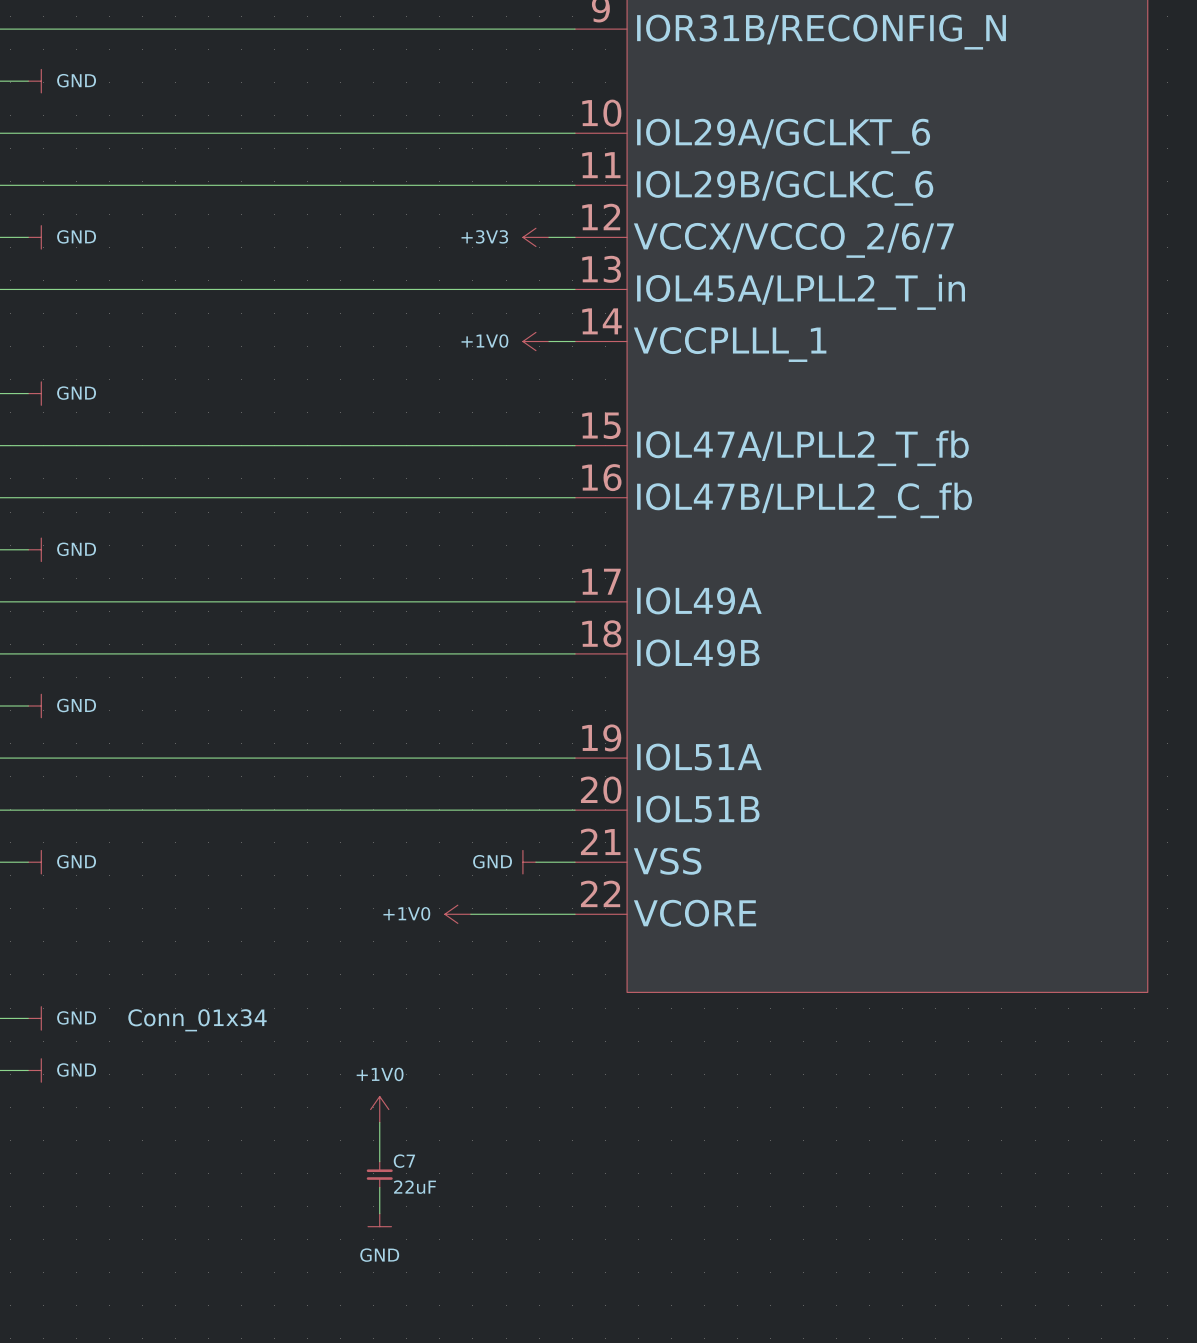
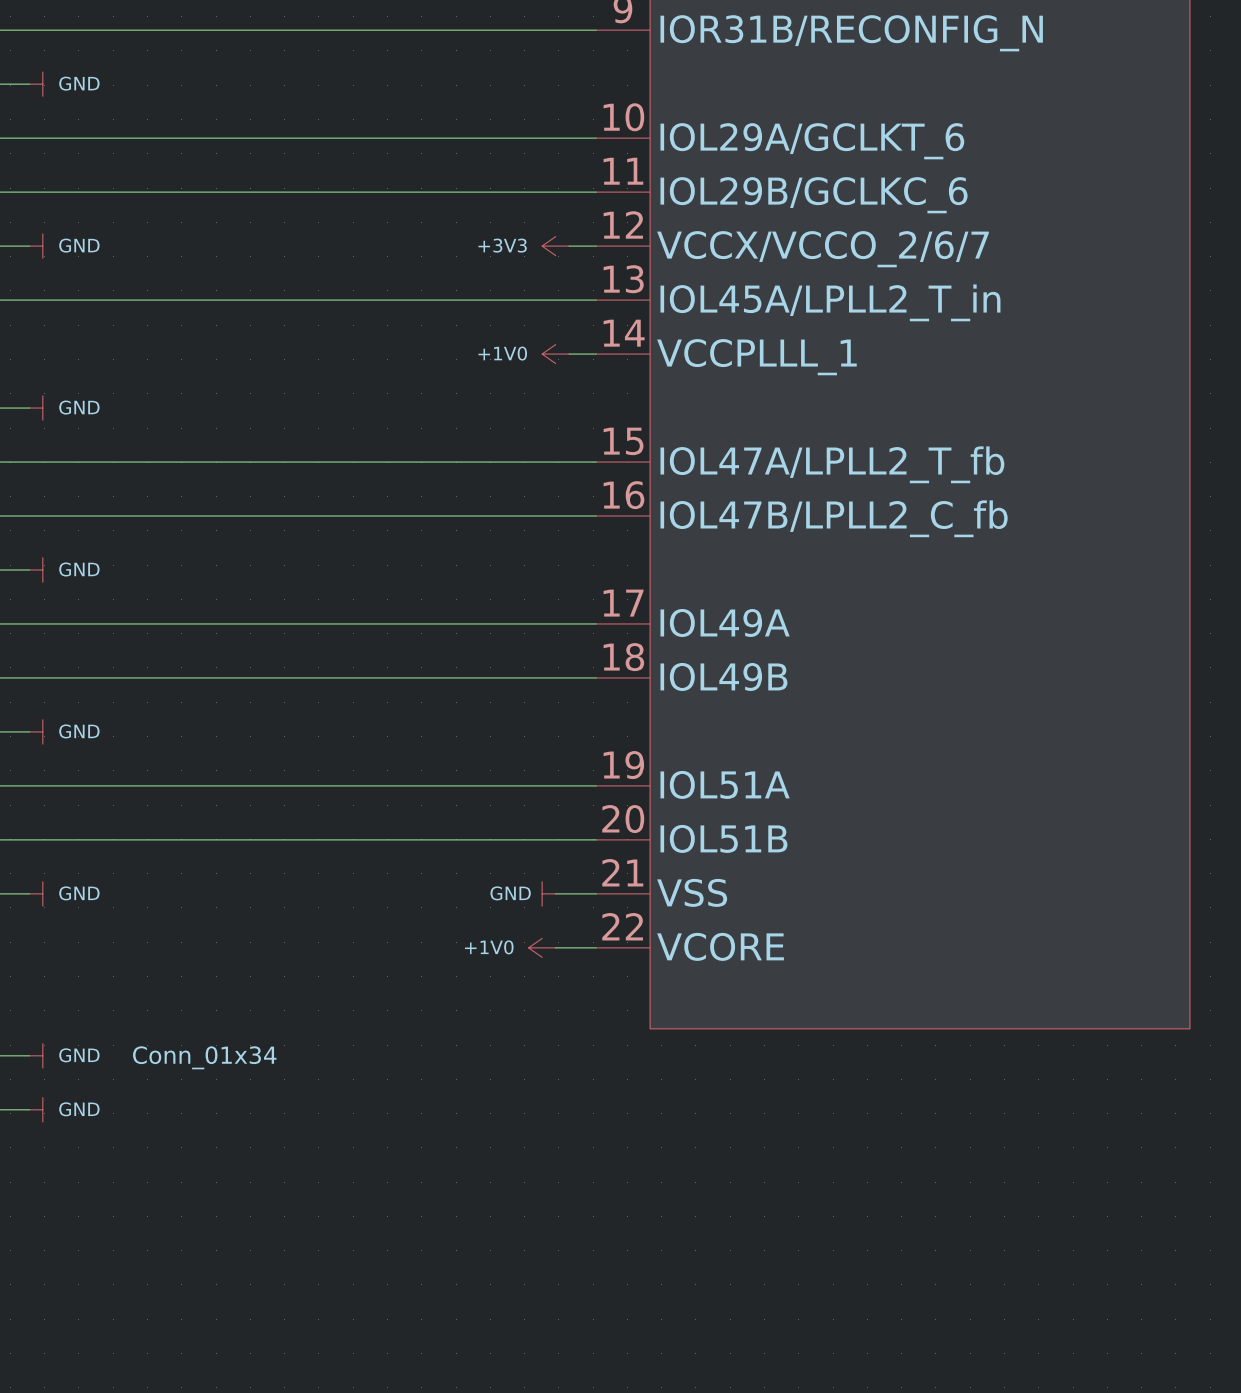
power symbol position: +1V0 (457, 914) -> +1V0 (542, 947)
wire: (470, 914) (535, 914) -> none
power symbol: +1V0 (379, 1109) -> none
wire: (379, 1122) (379, 1161) -> none
C7: 22uF (379, 1174) -> none
wire: (379, 1187) (379, 1213) -> none
power symbol: GND (379, 1220) -> none

